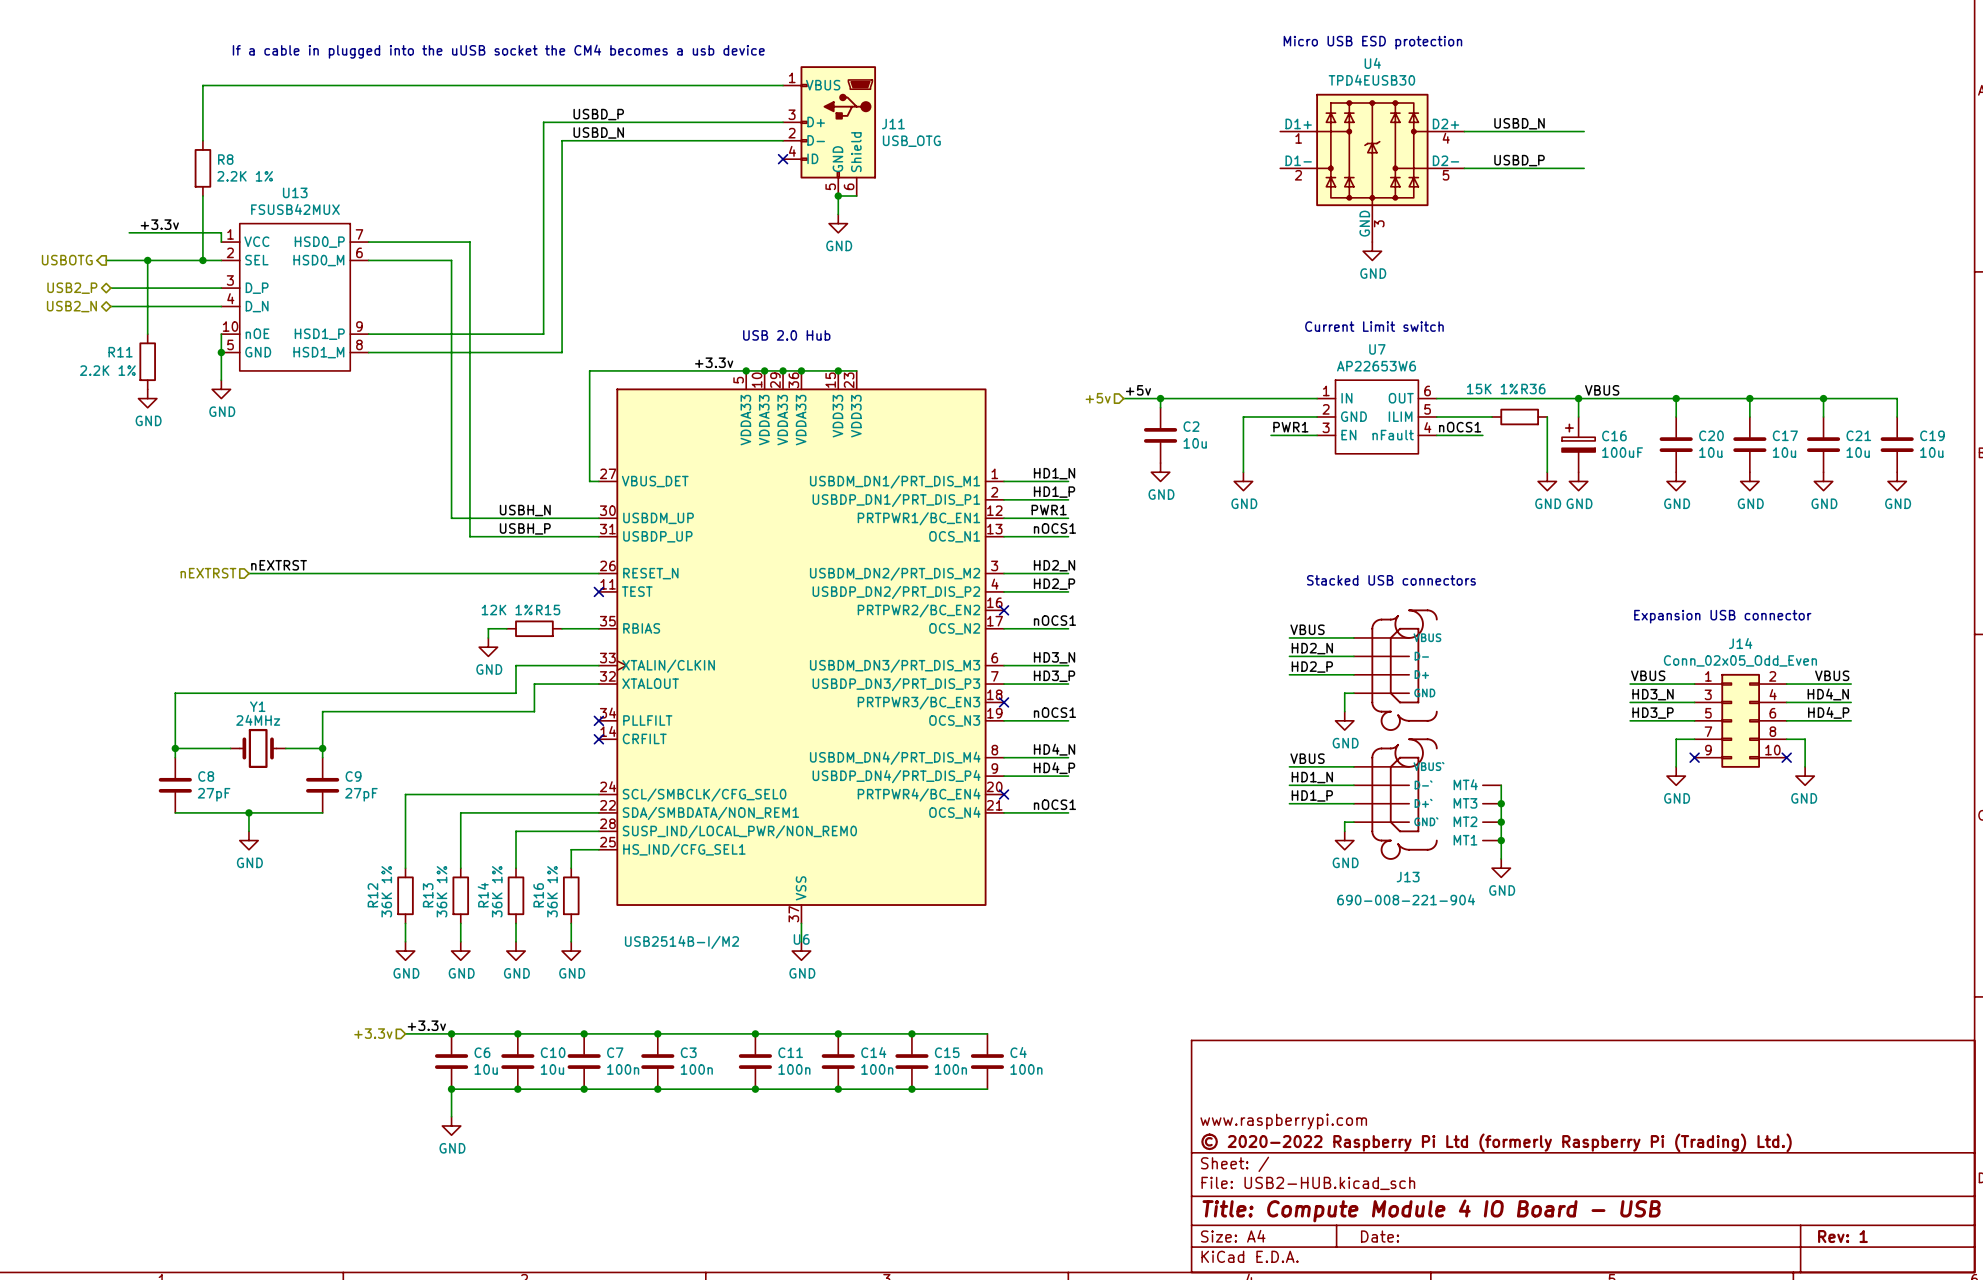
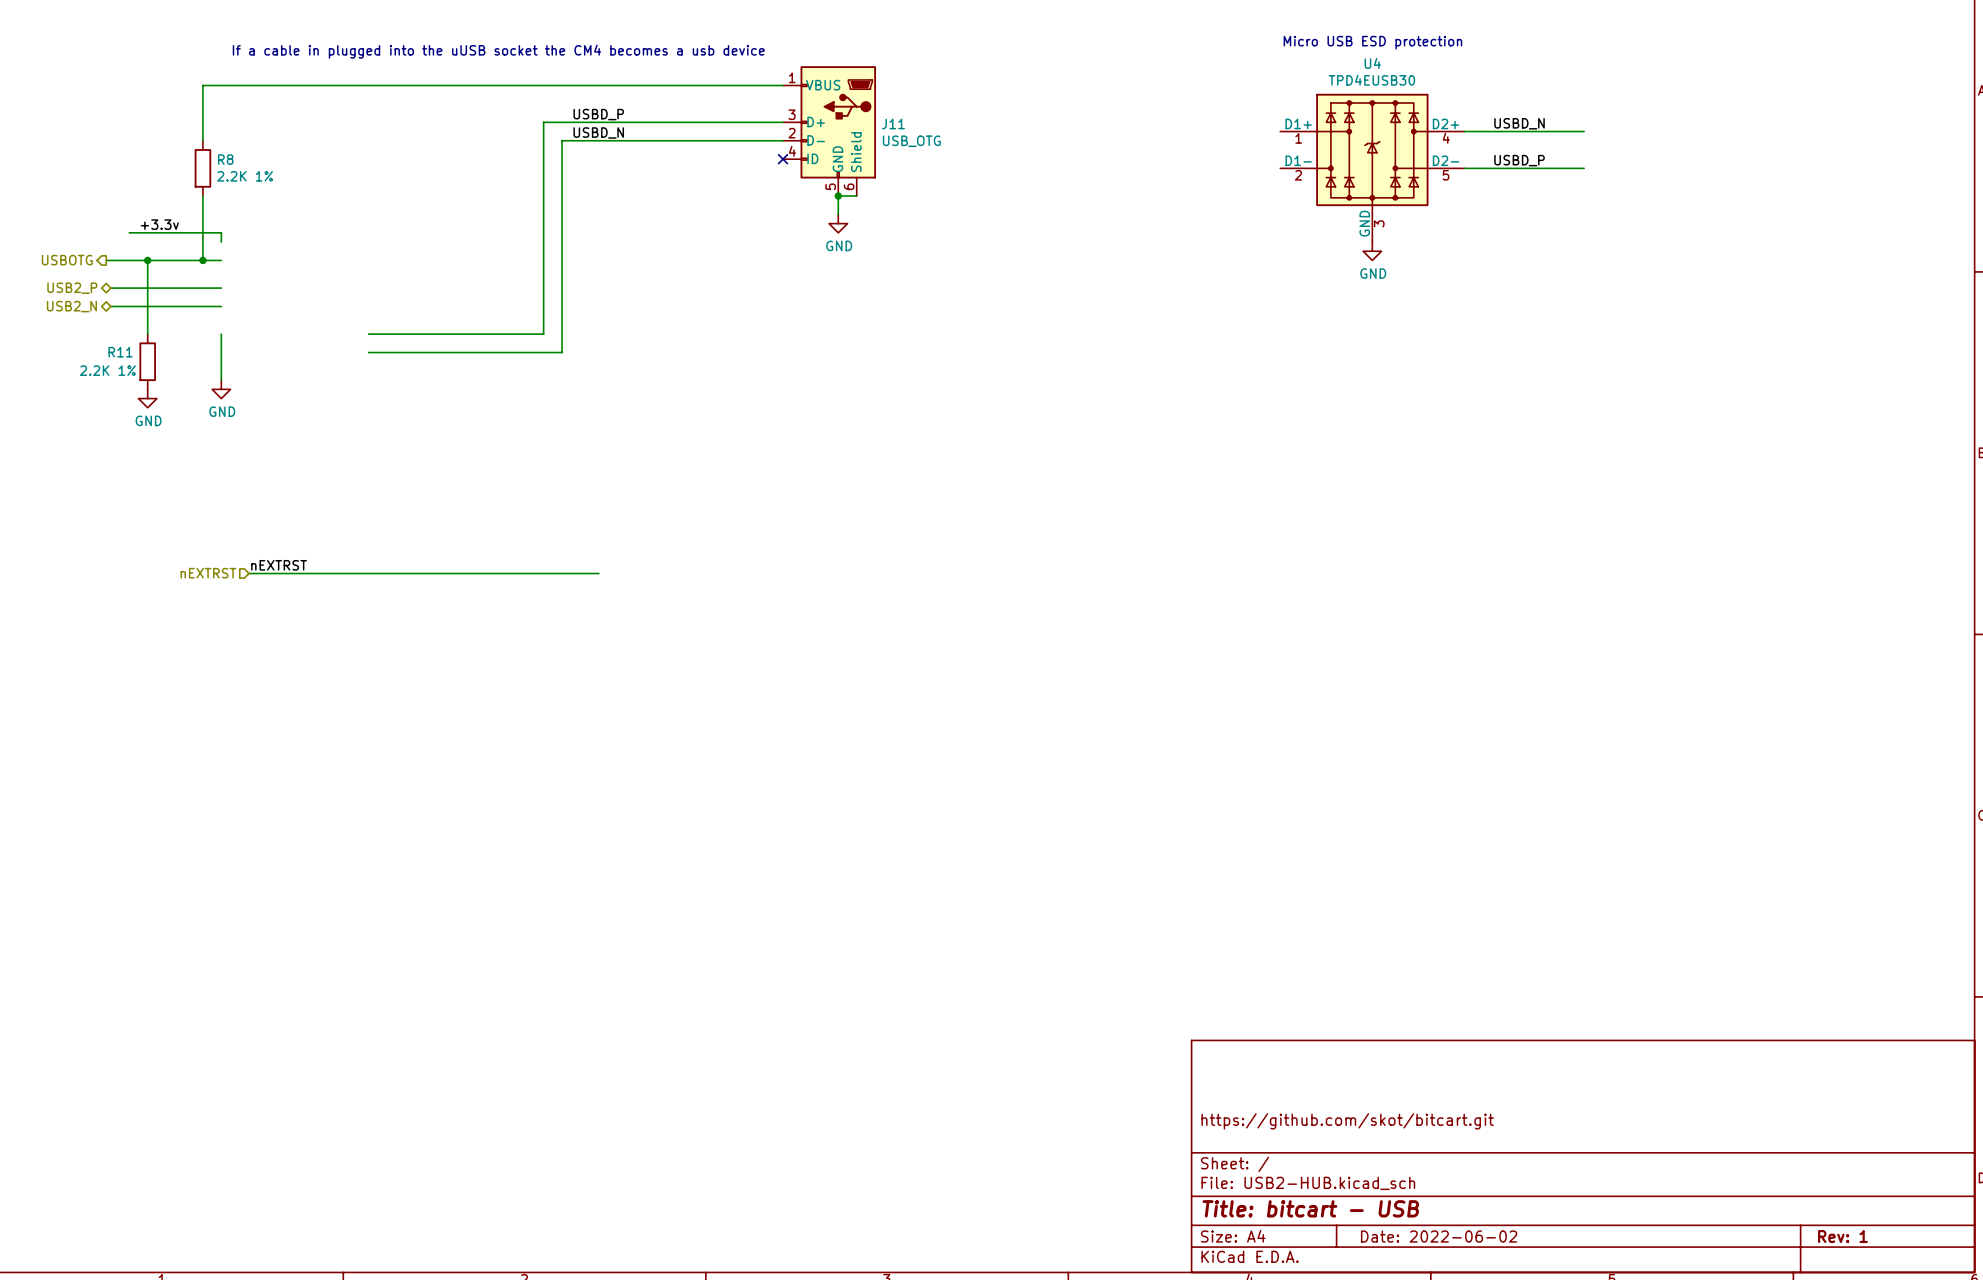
wire: (368, 242) (469, 242) (469, 536) (598, 536) -> none
wire: (368, 260) (451, 260) (451, 518) (598, 518) -> none
U13: FSUSB42MUX (295, 297) -> none
text: Current Limit switch (1374, 326) -> none
text: USB 2.0 Hub (786, 335) -> none
junction: (221, 352) -> none
label: +3.3v (714, 362) -> none
junction: (746, 370) -> none
junction: (764, 370) -> none
junction: (783, 370) -> none
junction: (801, 370) -> none
junction: (838, 370) -> none
wire: (856, 370) (589, 370) (589, 481) (598, 481) -> none
label: +5v (1138, 390) -> none
label: VBUS (1602, 390) -> none
hierarchical label: +5v (1098, 398) -> none
wire: (1123, 398) (1317, 398) -> none
wire: (1160, 398) (1160, 407) -> none
junction: (1160, 398) -> none
wire: (1436, 398) (1897, 398) (1897, 416) -> none
wire: (1578, 398) (1578, 416) -> none
junction: (1578, 398) -> none
wire: (1676, 398) (1676, 416) -> none
junction: (1676, 398) -> none
wire: (1749, 398) (1749, 416) -> none
junction: (1749, 398) -> none
wire: (1823, 398) (1823, 416) -> none
junction: (1823, 398) -> none
wire: (1317, 416) (1243, 416) (1243, 472) -> none
U7: AP22653W6 (1376, 416) -> none
wire: (1436, 416) (1492, 416) -> none
R36: 15K 1% (1519, 416) -> none
wire: (1547, 416) (1547, 472) -> none
label: PWR1 (1290, 427) -> none
label: nOCS1 (1460, 427) -> none
C2: 10u (1160, 435) -> none
wire: (1271, 435) (1317, 435) -> none
wire: (1436, 435) (1482, 435) -> none
C16: 100uF (1578, 444) -> none
C20: 10u (1676, 444) -> none
C17: 10u (1749, 444) -> none
C21: 10u (1823, 444) -> none
C19: 10u (1897, 444) -> none
power symbol: GND (1160, 472) -> none
label: HD1_N (1054, 473) -> none
wire: (1004, 481) (1068, 481) -> none
power symbol: GND (1243, 481) -> none
power symbol: GND (1547, 481) -> none
power symbol: GND (1578, 481) -> none
power symbol: GND (1676, 481) -> none
power symbol: GND (1749, 481) -> none
power symbol: GND (1823, 481) -> none
power symbol: GND (1897, 481) -> none
label: HD1_P (1054, 492) -> none
wire: (1004, 499) (1068, 499) -> none
label: USBH_N (525, 510) -> none
label: PWR1 (1049, 510) -> none
wire: (1004, 518) (1068, 518) -> none
label: USBH_P (525, 528) -> none
label: nOCS1 (1054, 528) -> none
wire: (1004, 536) (1068, 536) -> none
label: HD2_N (1054, 565) -> none
wire: (1004, 573) (1068, 573) -> none
text: Stacked USB connectors (1391, 580) -> none
label: HD2_P (1054, 584) -> none
no-connect mark: (598, 591) -> none
wire: (1004, 591) (1068, 591) -> none
no-connect mark: (1004, 610) -> none
text: Expansion USB connector (1722, 616) -> none
label: nOCS1 (1054, 620) -> none
wire: (506, 628) (488, 628) (488, 637) -> none
R15: 12K 1% (534, 628) -> none
wire: (562, 628) (598, 628) -> none
wire: (1004, 628) (1068, 628) -> none
label: VBUS (1307, 629) -> none
wire: (1289, 637) (1353, 637) -> none
power symbol: GND (488, 647) -> none
U6: USB2514B-I/M2 (801, 647) -> none
label: HD2_N (1312, 648) -> none
wire: (1289, 656) (1353, 656) -> none
label: HD3_N (1054, 657) -> none
wire: (598, 665) (516, 665) (516, 693) (175, 693) (175, 757) -> none
wire: (1004, 665) (1068, 665) -> none
label: HD2_P (1312, 667) -> none
wire: (1289, 674) (1353, 674) -> none
label: VBUS (1648, 675) -> none
label: VBUS (1832, 675) -> none
label: HD3_P (1054, 676) -> none
wire: (598, 684) (534, 684) (534, 711) (322, 711) (322, 757) -> none
wire: (1004, 684) (1068, 684) -> none
wire: (1630, 684) (1694, 684) -> none
wire: (1786, 684) (1851, 684) -> none
wire: (1353, 693) (1344, 693) (1344, 711) -> none
label: HD3_N (1653, 694) -> none
label: HD4_N (1828, 694) -> none
no-connect mark: (1004, 702) -> none
wire: (1630, 702) (1694, 702) -> none
wire: (1786, 702) (1851, 702) -> none
label: nOCS1 (1054, 712) -> none
label: HD4_P (1828, 712) -> none
label: HD3_P (1653, 713) -> none
no-connect mark: (598, 720) -> none
wire: (1004, 720) (1068, 720) -> none
power symbol: GND (1344, 720) -> none
wire: (1630, 720) (1694, 720) -> none
J14: Conn_02x05_Odd_Even (1740, 720) -> none
wire: (1786, 720) (1851, 720) -> none
J13: 690-008-221-904 (1427, 734) -> none
no-connect mark: (598, 739) -> none
wire: (1694, 739) (1676, 739) (1676, 766) -> none
wire: (1786, 739) (1805, 739) (1805, 766) -> none
wire: (175, 748) (230, 748) -> none
junction: (175, 748) -> none
Y1: 24MHz (258, 748) -> none
wire: (285, 748) (322, 748) -> none
junction: (322, 748) -> none
label: HD4_N (1054, 749) -> none
wire: (1004, 757) (1068, 757) -> none
no-connect mark: (1694, 757) -> none
no-connect mark: (1786, 757) -> none
label: VBUS (1307, 758) -> none
wire: (1289, 766) (1353, 766) -> none
label: HD4_P (1054, 768) -> none
wire: (1004, 776) (1068, 776) -> none
power symbol: GND (1676, 776) -> none
power symbol: GND (1805, 776) -> none
label: HD1_N (1312, 777) -> none
C8: 27pF (175, 785) -> none
C9: 27pF (322, 785) -> none
wire: (1289, 785) (1353, 785) -> none
wire: (1501, 785) (1501, 858) -> none
wire: (598, 794) (405, 794) (405, 868) -> none
no-connect mark: (1004, 794) -> none
label: HD1_P (1312, 795) -> none
wire: (1289, 803) (1353, 803) -> none
junction: (1501, 803) -> none
label: nOCS1 (1054, 804) -> none
wire: (175, 812) (322, 812) -> none
wire: (248, 812) (248, 831) -> none
junction: (248, 812) -> none
wire: (598, 812) (460, 812) (460, 868) -> none
wire: (1004, 812) (1068, 812) -> none
wire: (1353, 822) (1344, 822) (1344, 831) -> none
junction: (1501, 822) -> none
wire: (598, 831) (516, 831) (516, 868) -> none
power symbol: GND (248, 840) -> none
power symbol: GND (1344, 840) -> none
junction: (1501, 840) -> none
wire: (598, 849) (571, 849) (571, 868) -> none
power symbol: GND (1501, 868) -> none
R12: 36K 1% (405, 895) -> none
R13: 36K 1% (460, 895) -> none
R14: 36K 1% (516, 895) -> none
R16: 36K 1% (571, 895) -> none
wire: (405, 923) (405, 941) -> none
wire: (460, 923) (460, 941) -> none
wire: (516, 923) (516, 941) -> none
wire: (571, 923) (571, 941) -> none
wire: (801, 923) (801, 941) -> none
power symbol: GND (405, 951) -> none
power symbol: GND (460, 951) -> none
power symbol: GND (516, 951) -> none
power symbol: GND (571, 951) -> none
power symbol: GND (801, 951) -> none
label: +3.3v (426, 1025) -> none
hierarchical label: +3.3v (373, 1033) -> none
wire: (405, 1033) (987, 1033) -> none
junction: (451, 1033) -> none
junction: (517, 1033) -> none
junction: (584, 1033) -> none
junction: (657, 1033) -> none
junction: (755, 1033) -> none
junction: (838, 1033) -> none
junction: (911, 1033) -> none
C6: 10u (451, 1061) -> none
C10: 10u (517, 1061) -> none
C7: 100n (584, 1061) -> none
C3: 100n (657, 1061) -> none
C11: 100n (755, 1061) -> none
C14: 100n (838, 1061) -> none
C15: 100n (911, 1061) -> none
C4: 100n (987, 1061) -> none
junction: (451, 1089) -> none
junction: (517, 1089) -> none
junction: (584, 1089) -> none
junction: (657, 1089) -> none
junction: (755, 1089) -> none
junction: (838, 1089) -> none
junction: (911, 1089) -> none
wire: (987, 1089) (451, 1089) (451, 1116) -> none
title block: www.raspberrypi.com (1283, 1121) -> https://github.com/skot/bitcart.git (1347, 1121)
power symbol: GND (451, 1126) -> none
title block: © 2020-2022 Raspberry Pi Ltd (formerly Raspberry Pi (Trading) Ltd.) (1496, 1142) -> none
title block: Title: Compute Module 4 IO Board - USB (1431, 1210) -> Title: bitcart - USB (1310, 1208)
title block: Date: (1380, 1236) -> Date: 2022-06-02 (1439, 1236)

